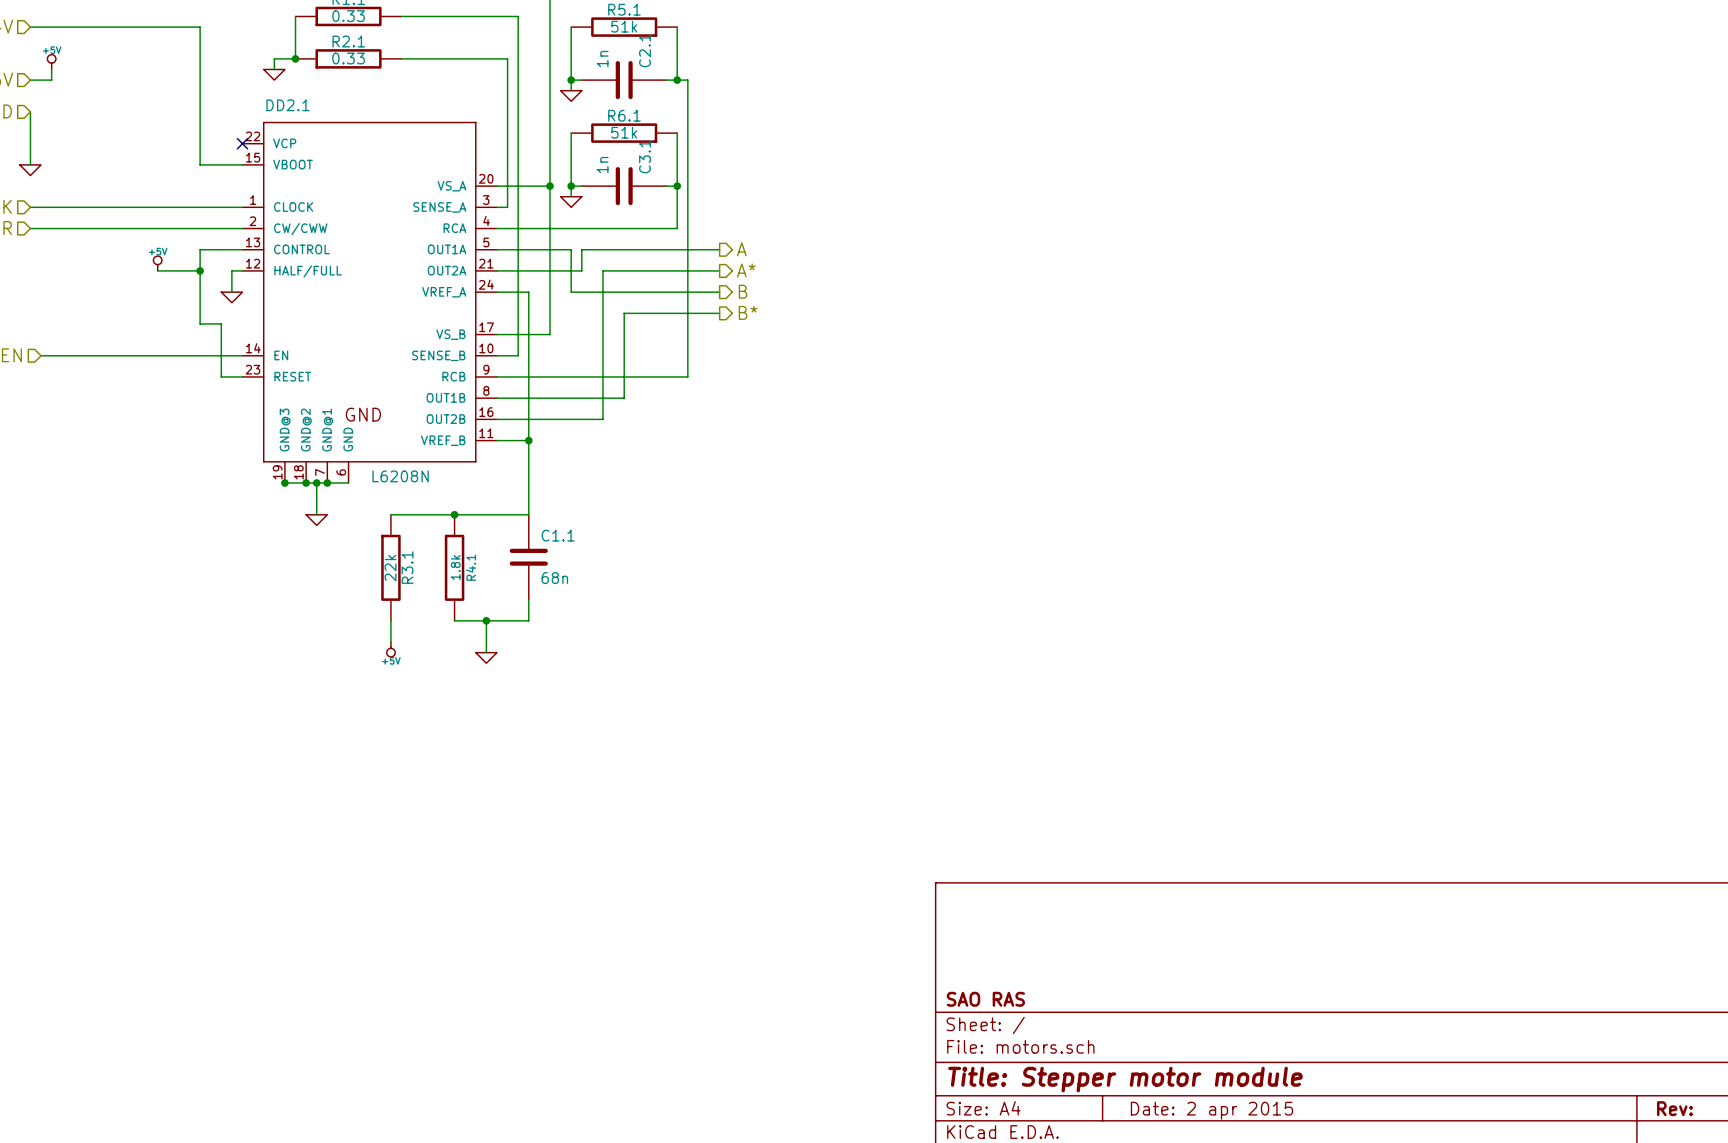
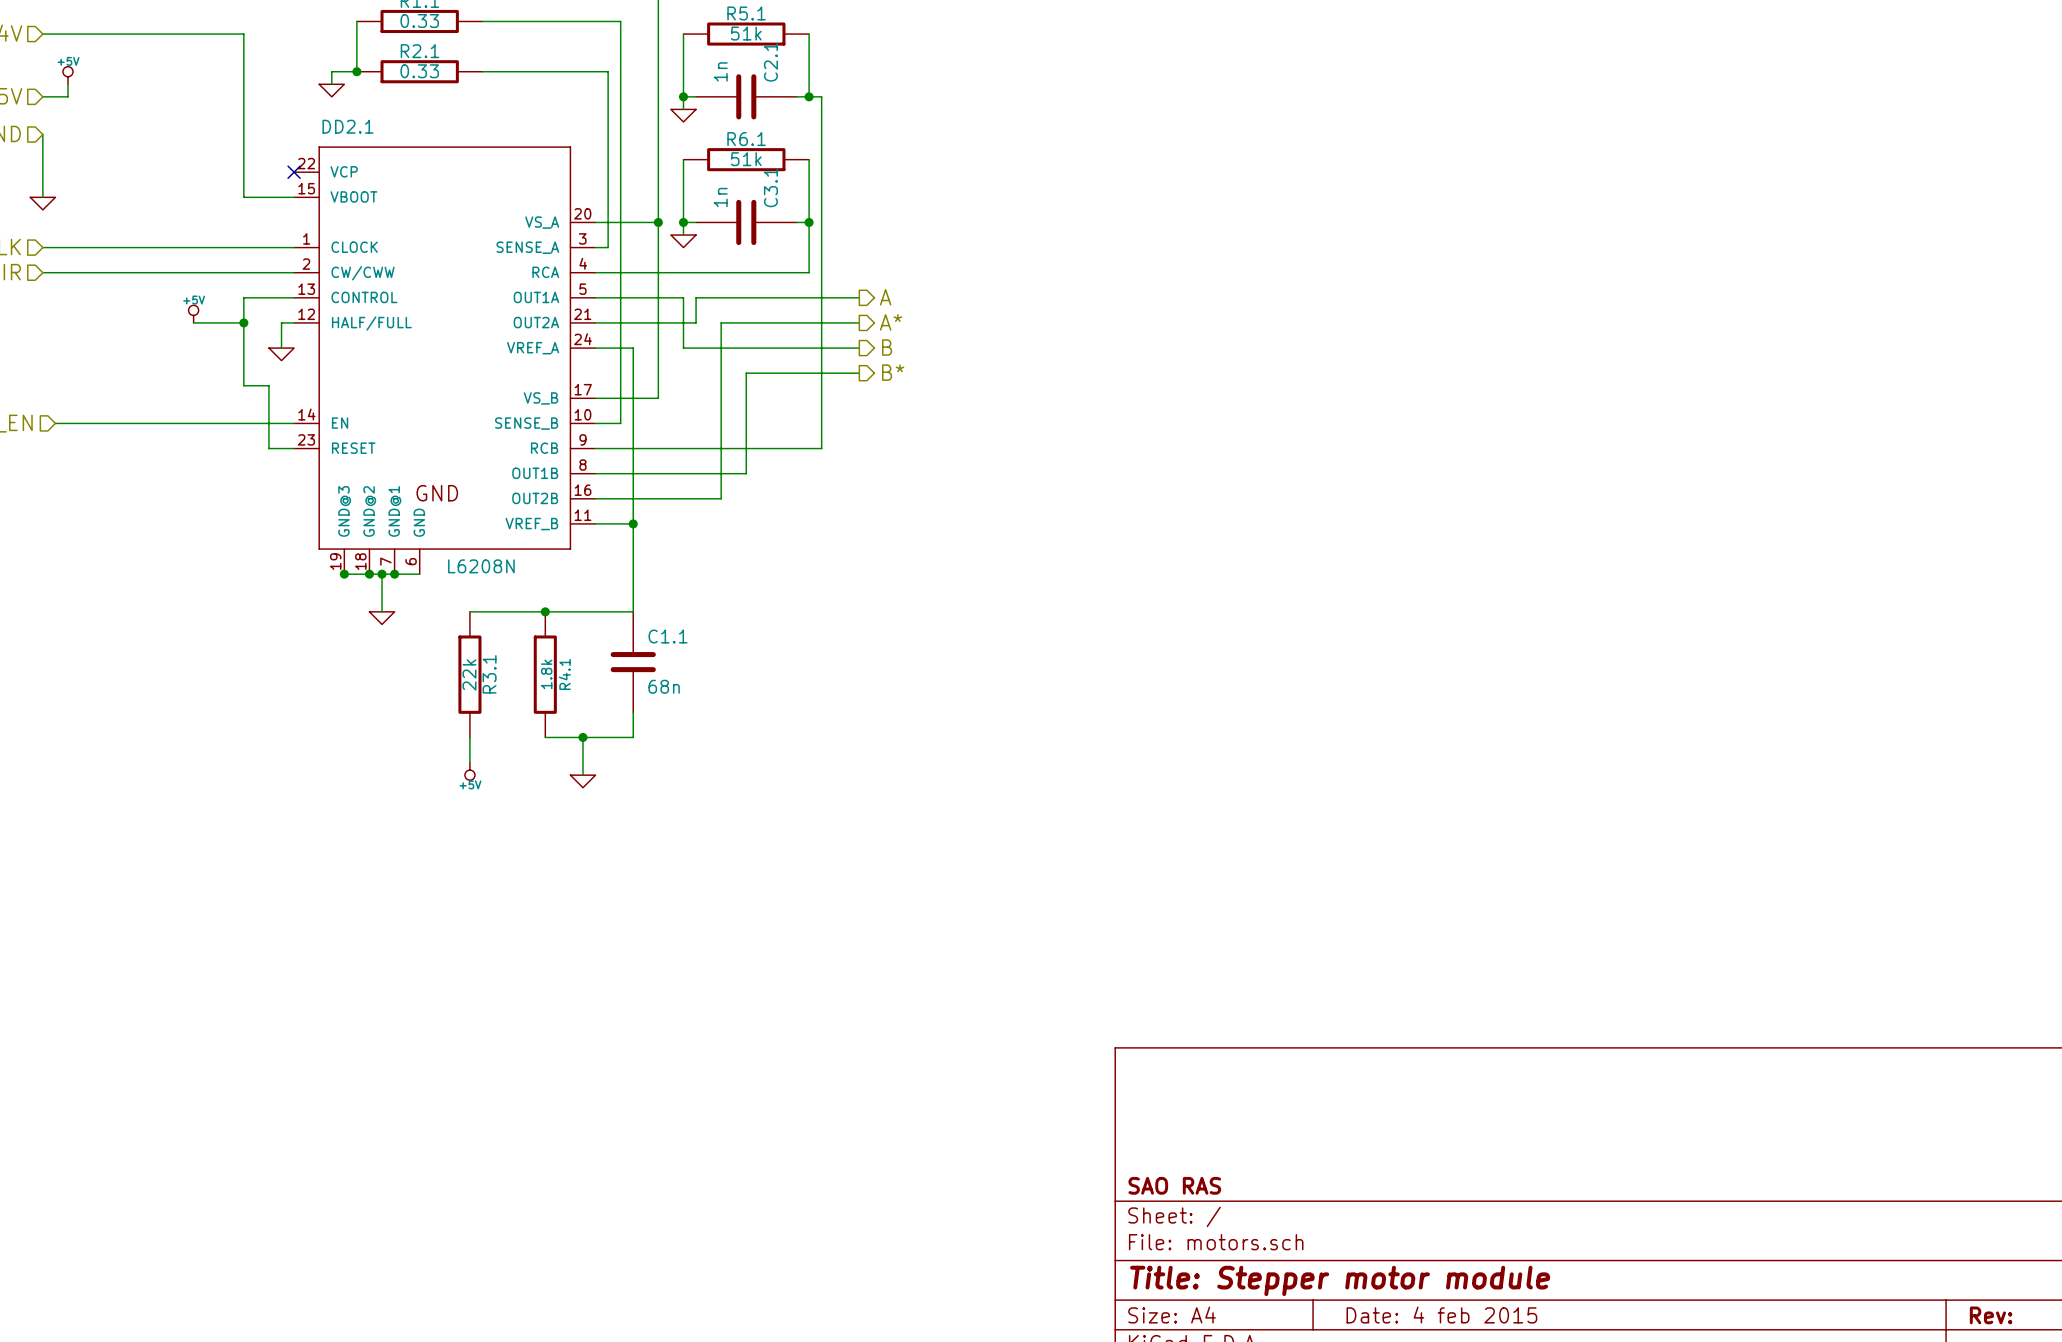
title block: Date: 2 apr 2015 (1211, 1110) -> Date: 4 feb 2015 (1441, 1315)

